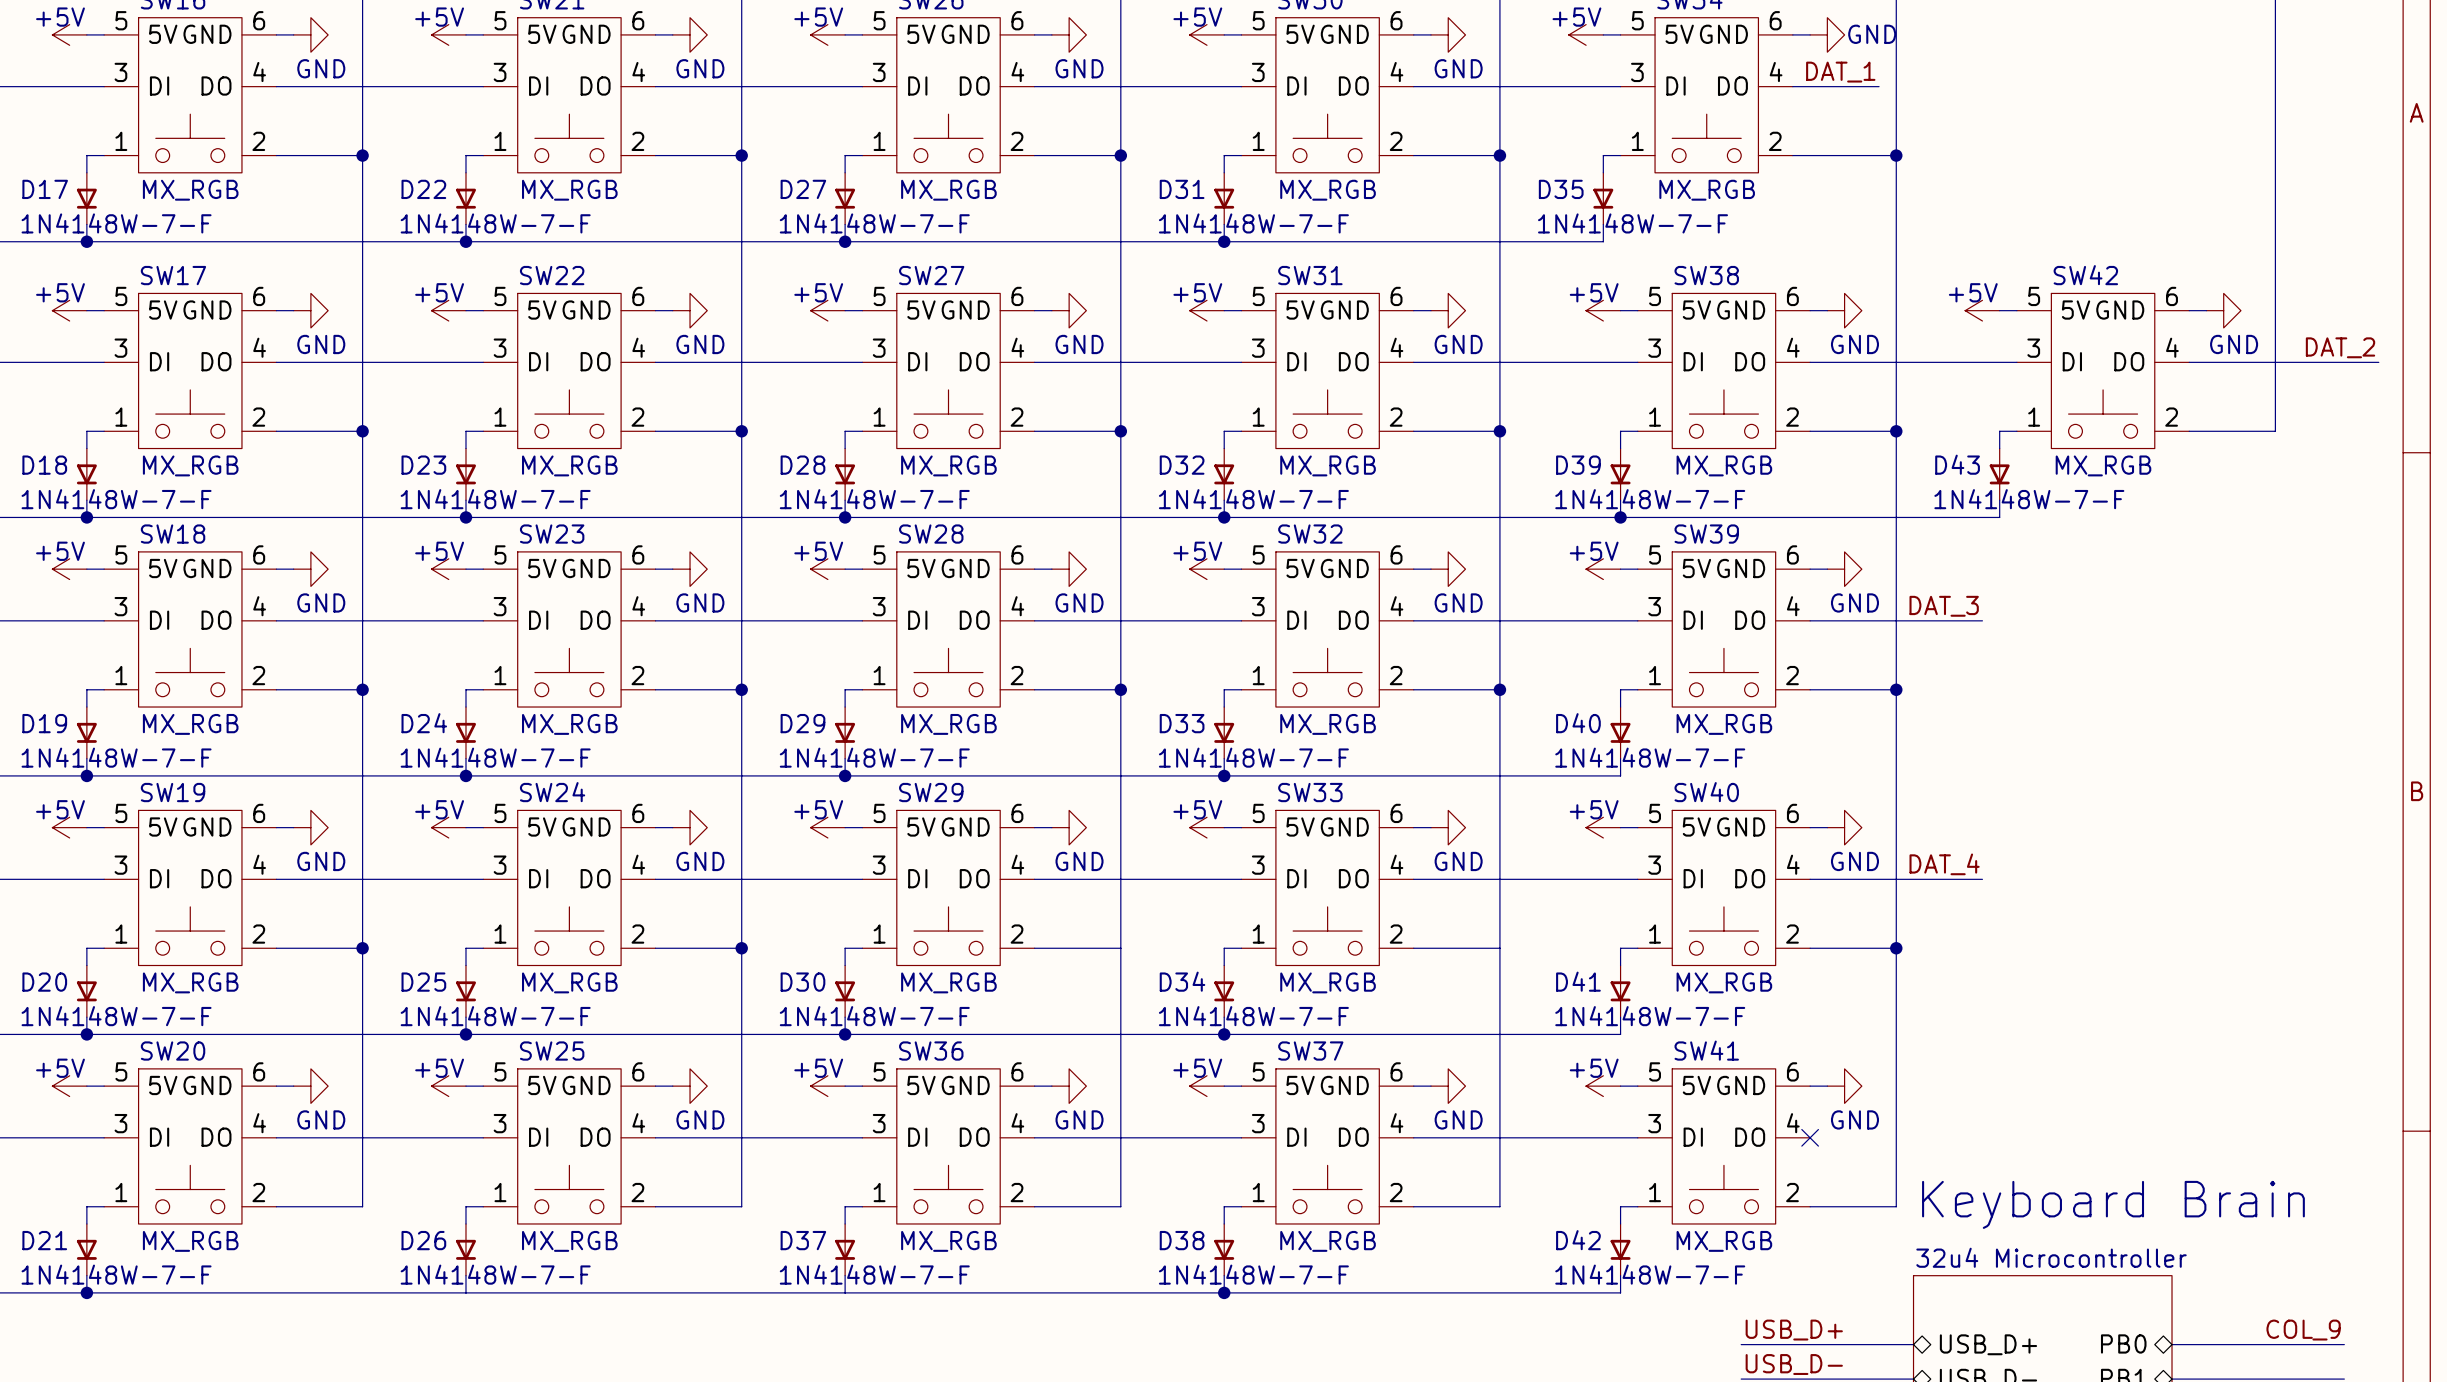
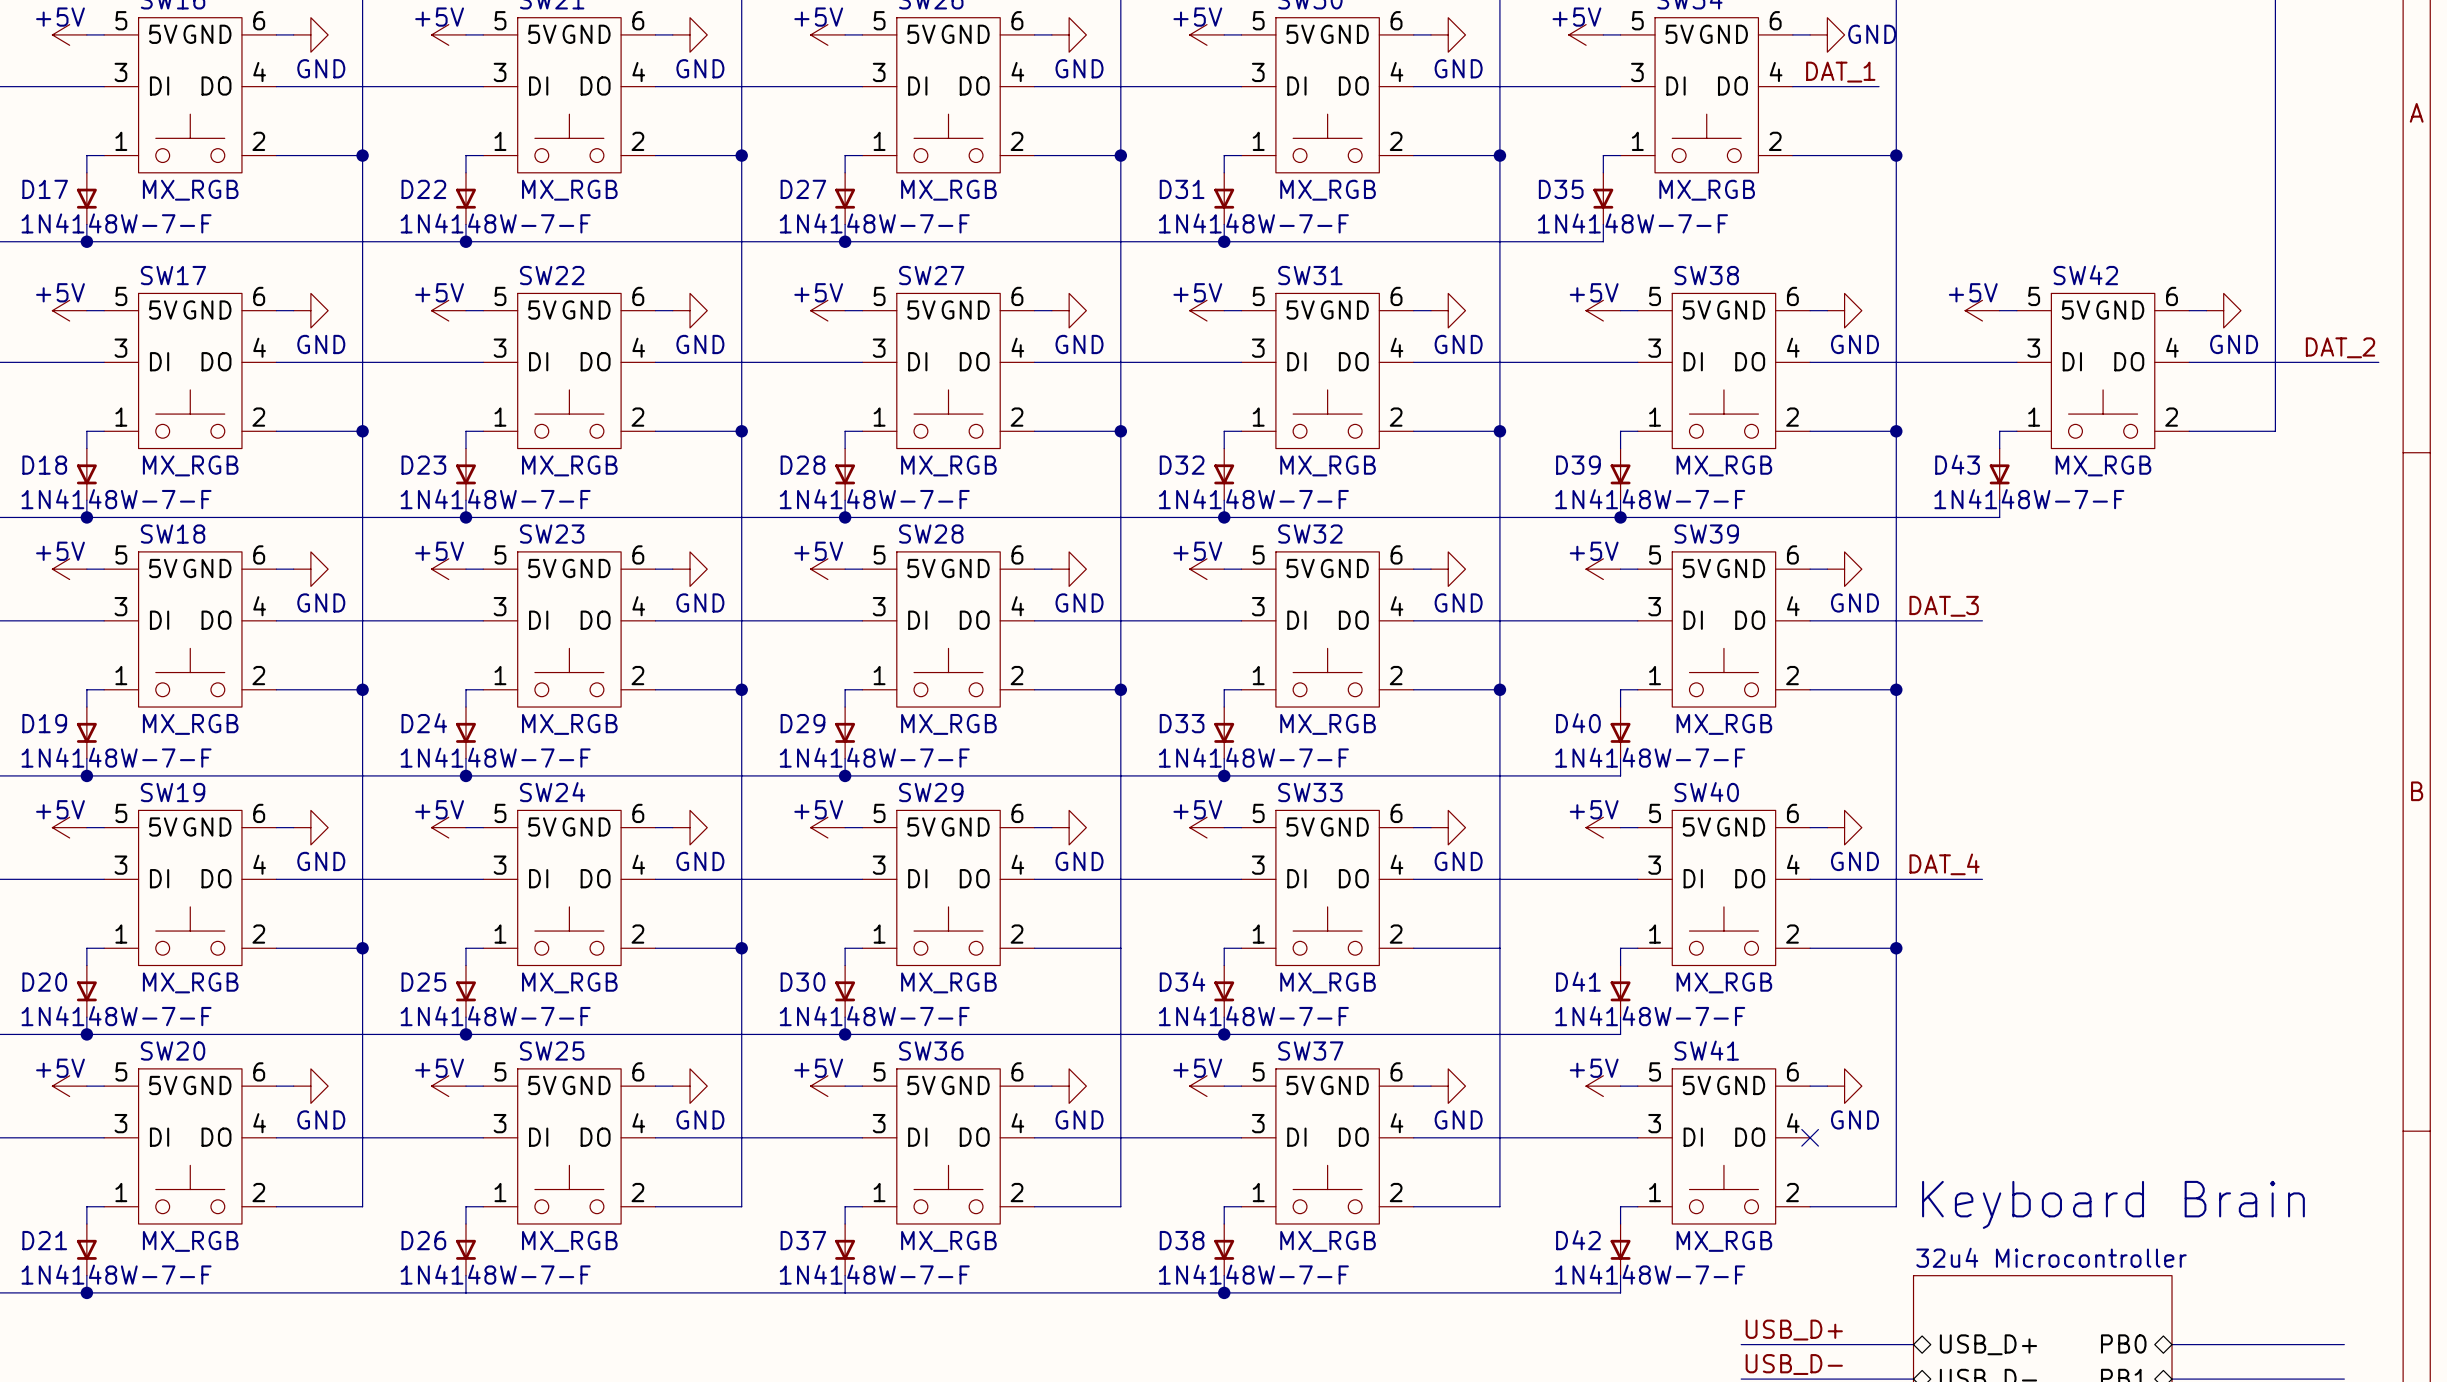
label: COL_9 (2303, 1330) -> none

